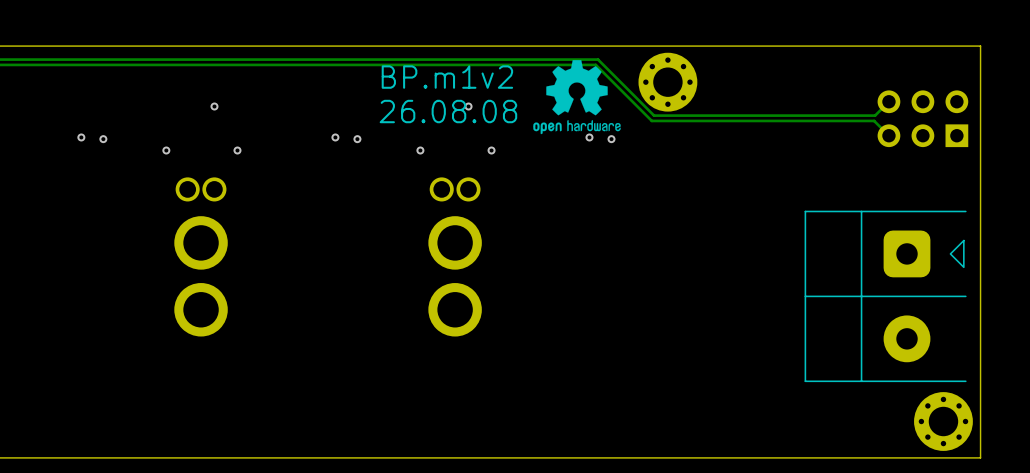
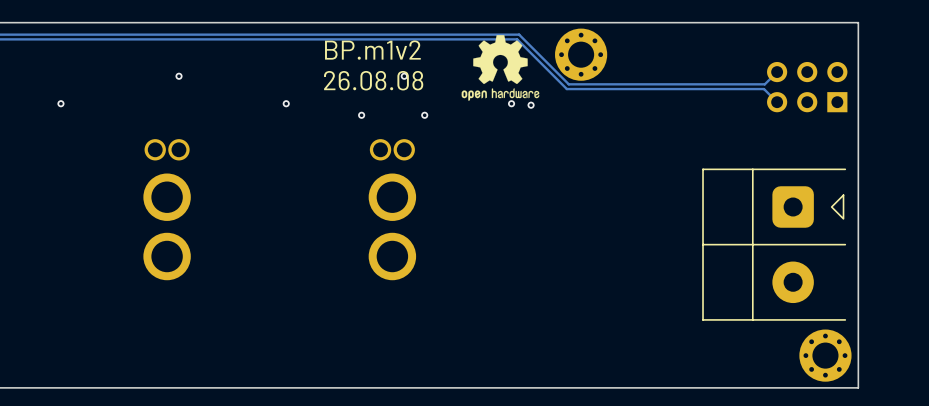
via: (103, 139) -> none
via: (357, 139) -> none
via: (166, 150) -> none
via: (237, 150) -> none

